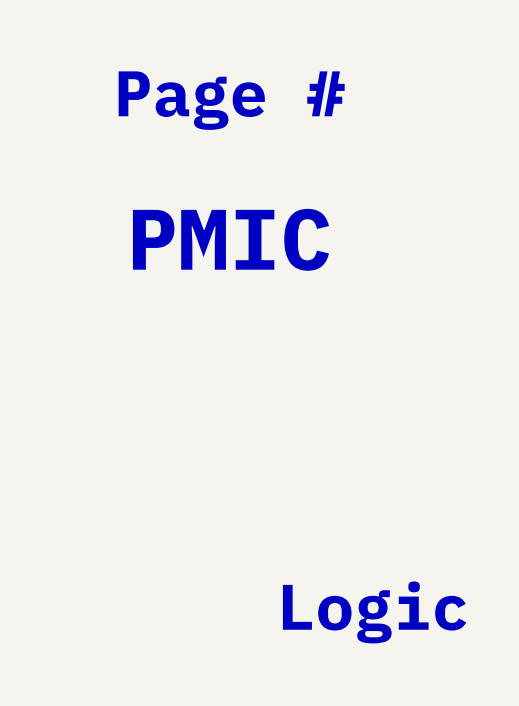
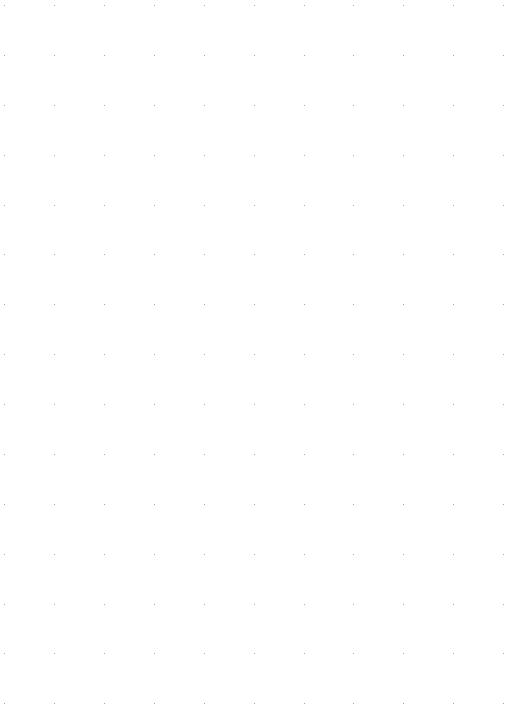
text: Page # (231, 100) -> none
text: PMIC (230, 239) -> none
text: Logic (374, 612) -> none

